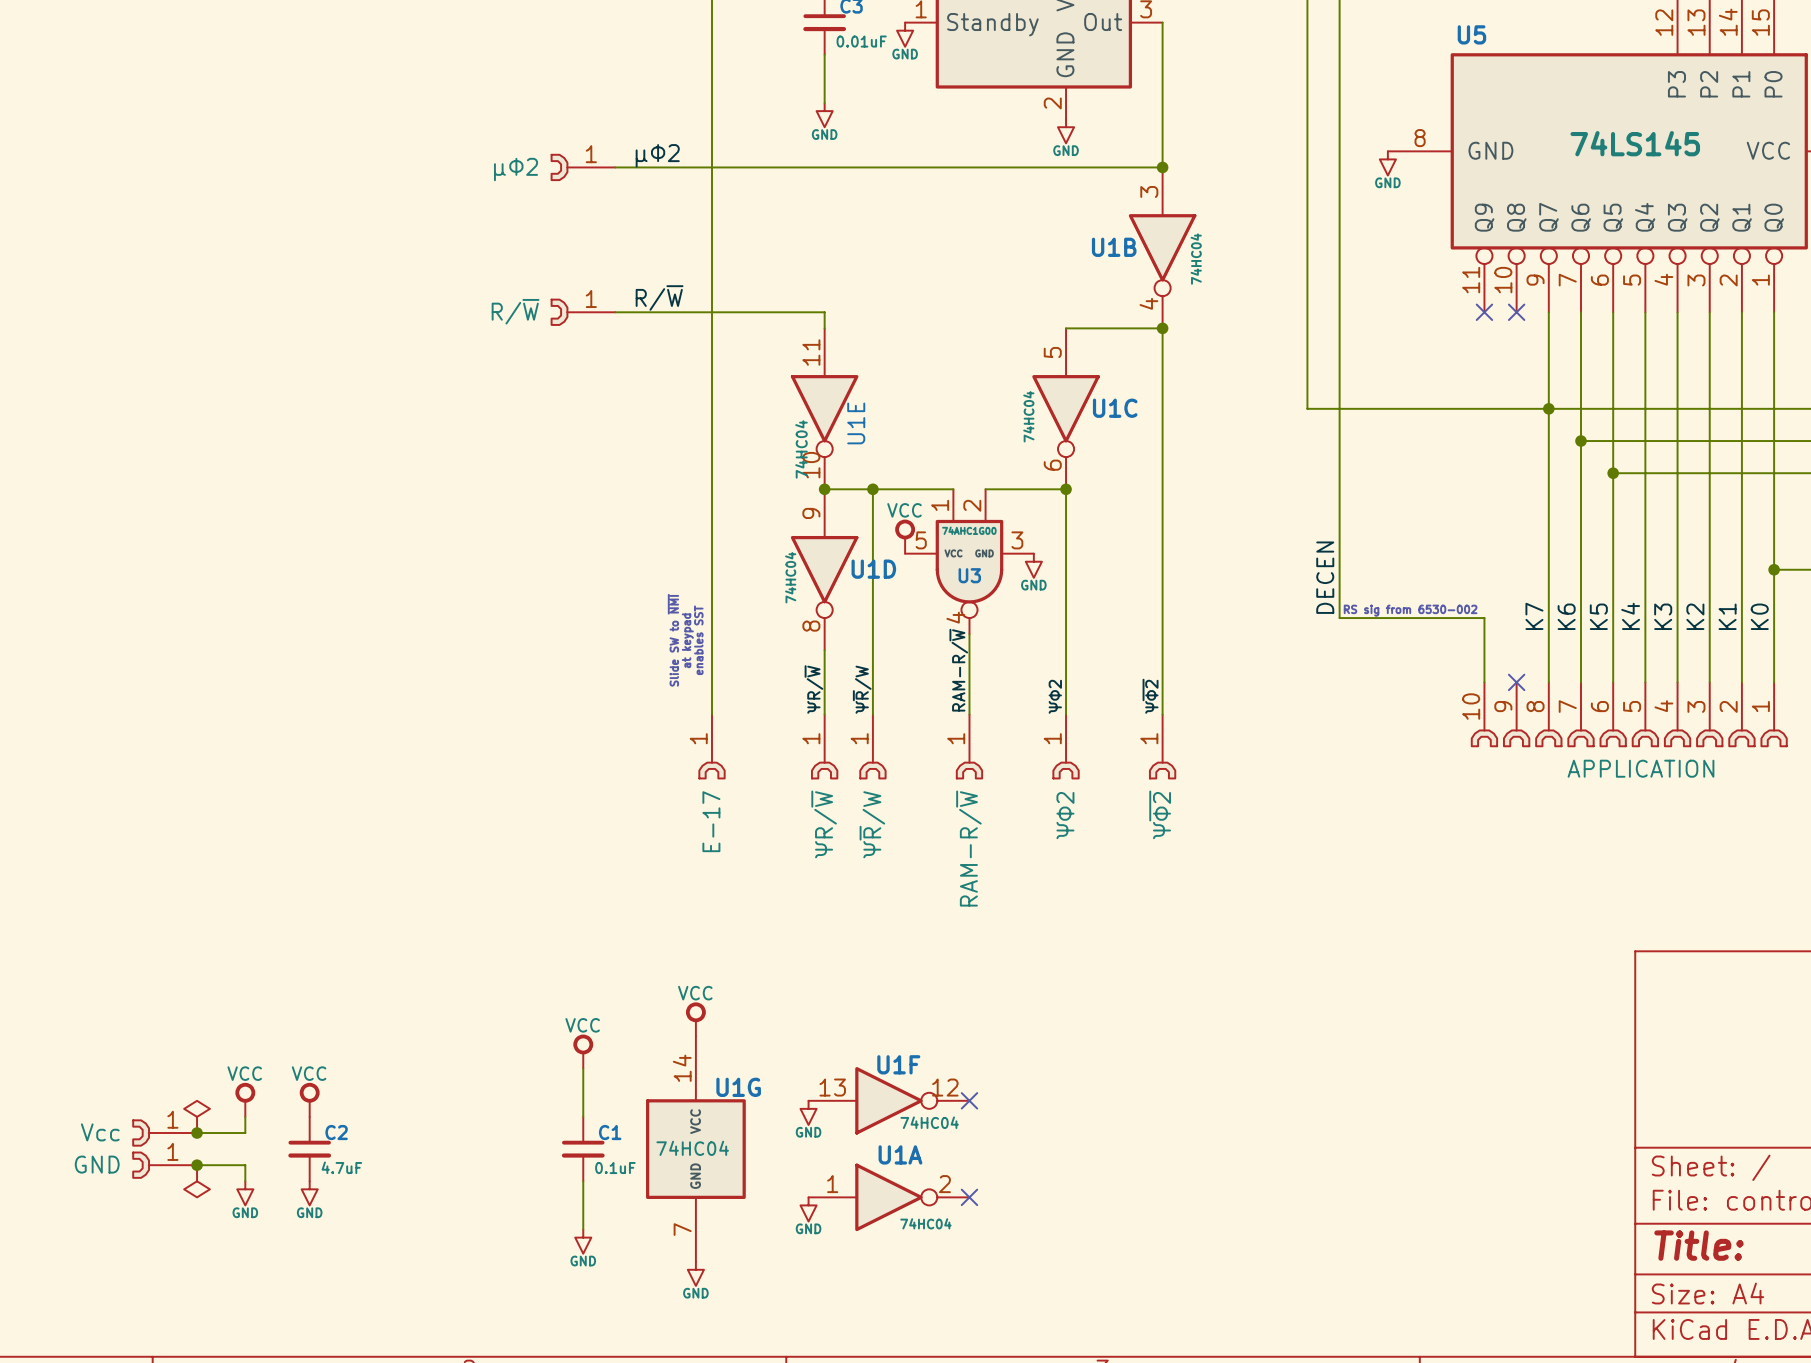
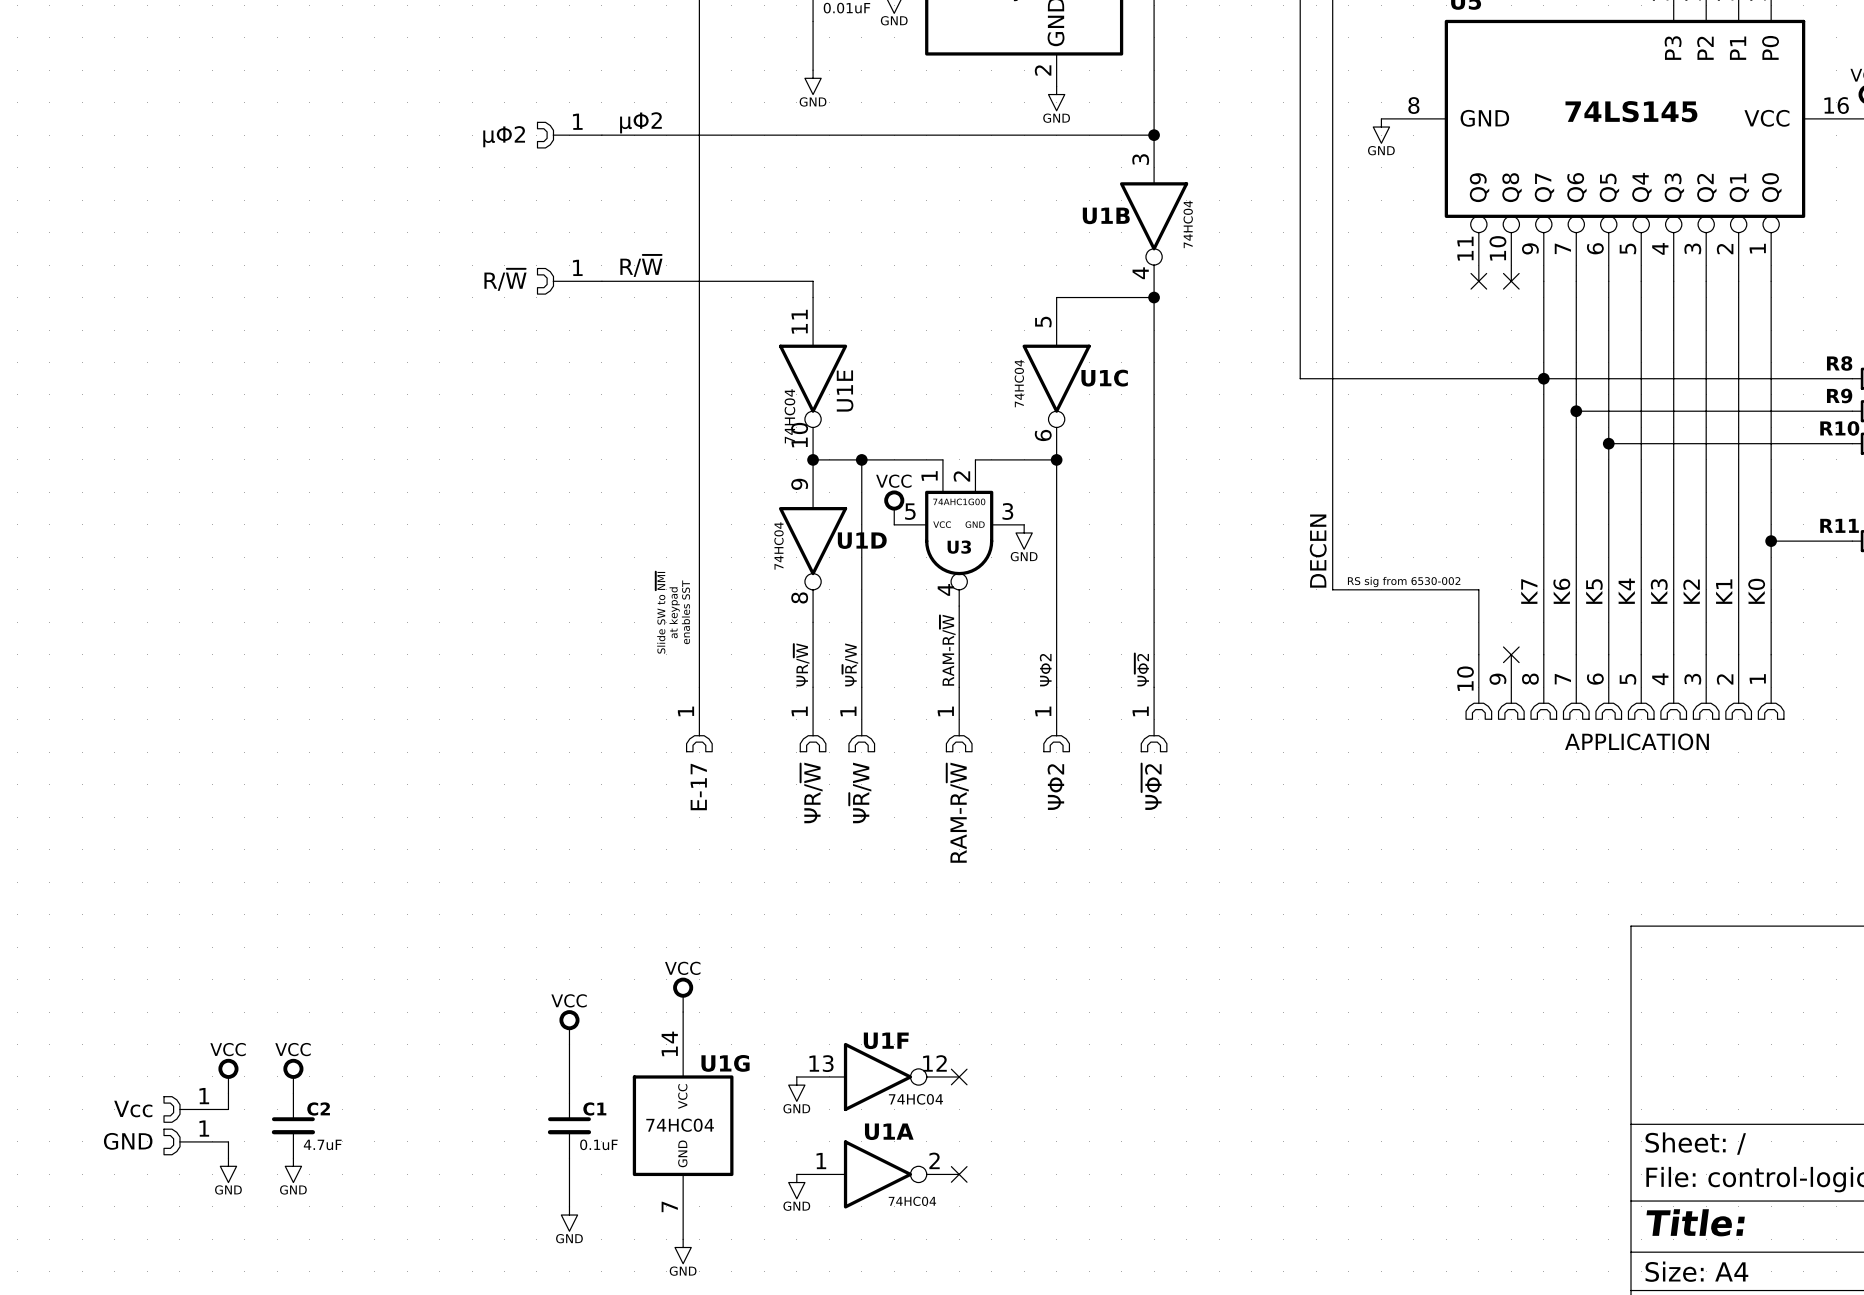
power symbol: (197, 1116) -> none
part position: (165, 1133) -> (196, 1109)
junction: (197, 1133) -> none
part position: (165, 1165) -> (196, 1141)
junction: (197, 1165) -> none
power symbol: (197, 1181) -> none

